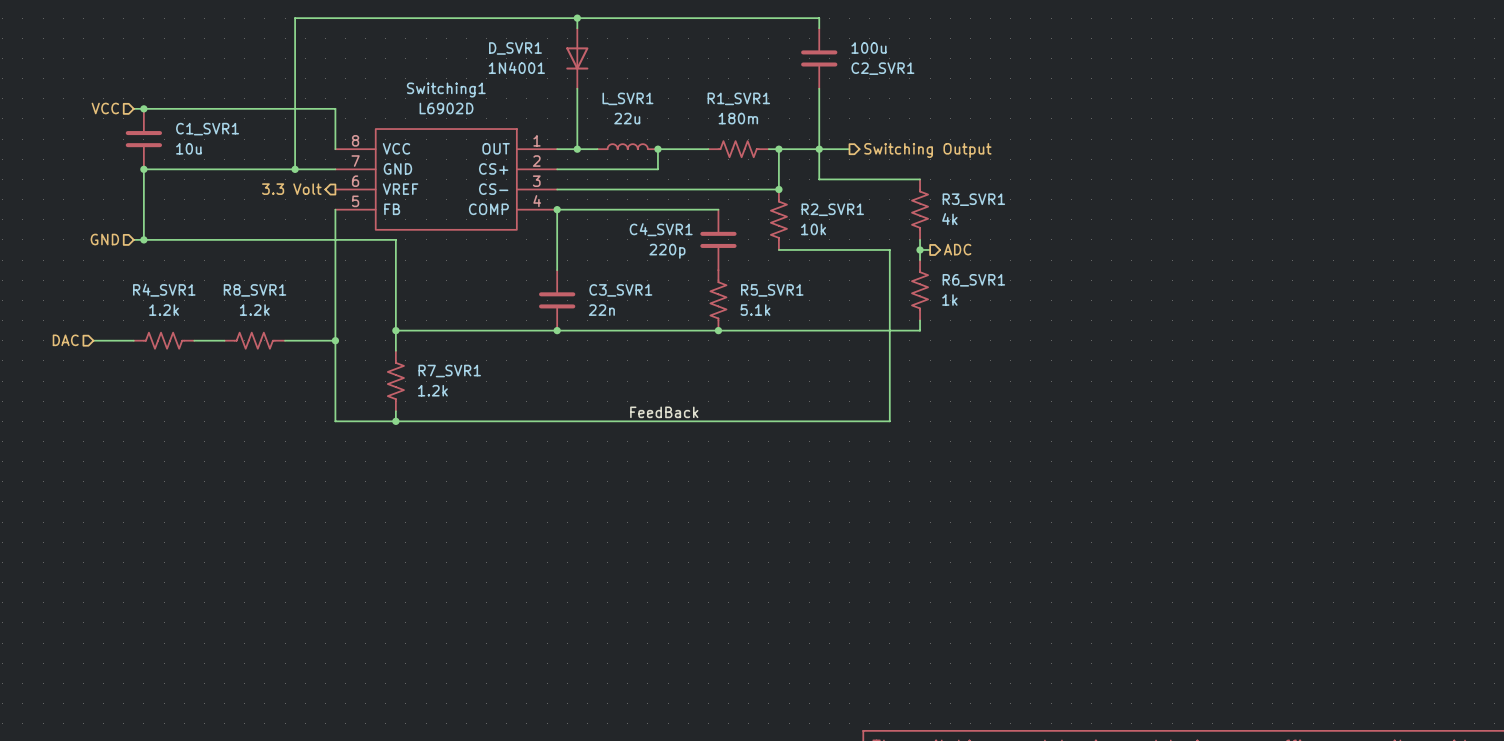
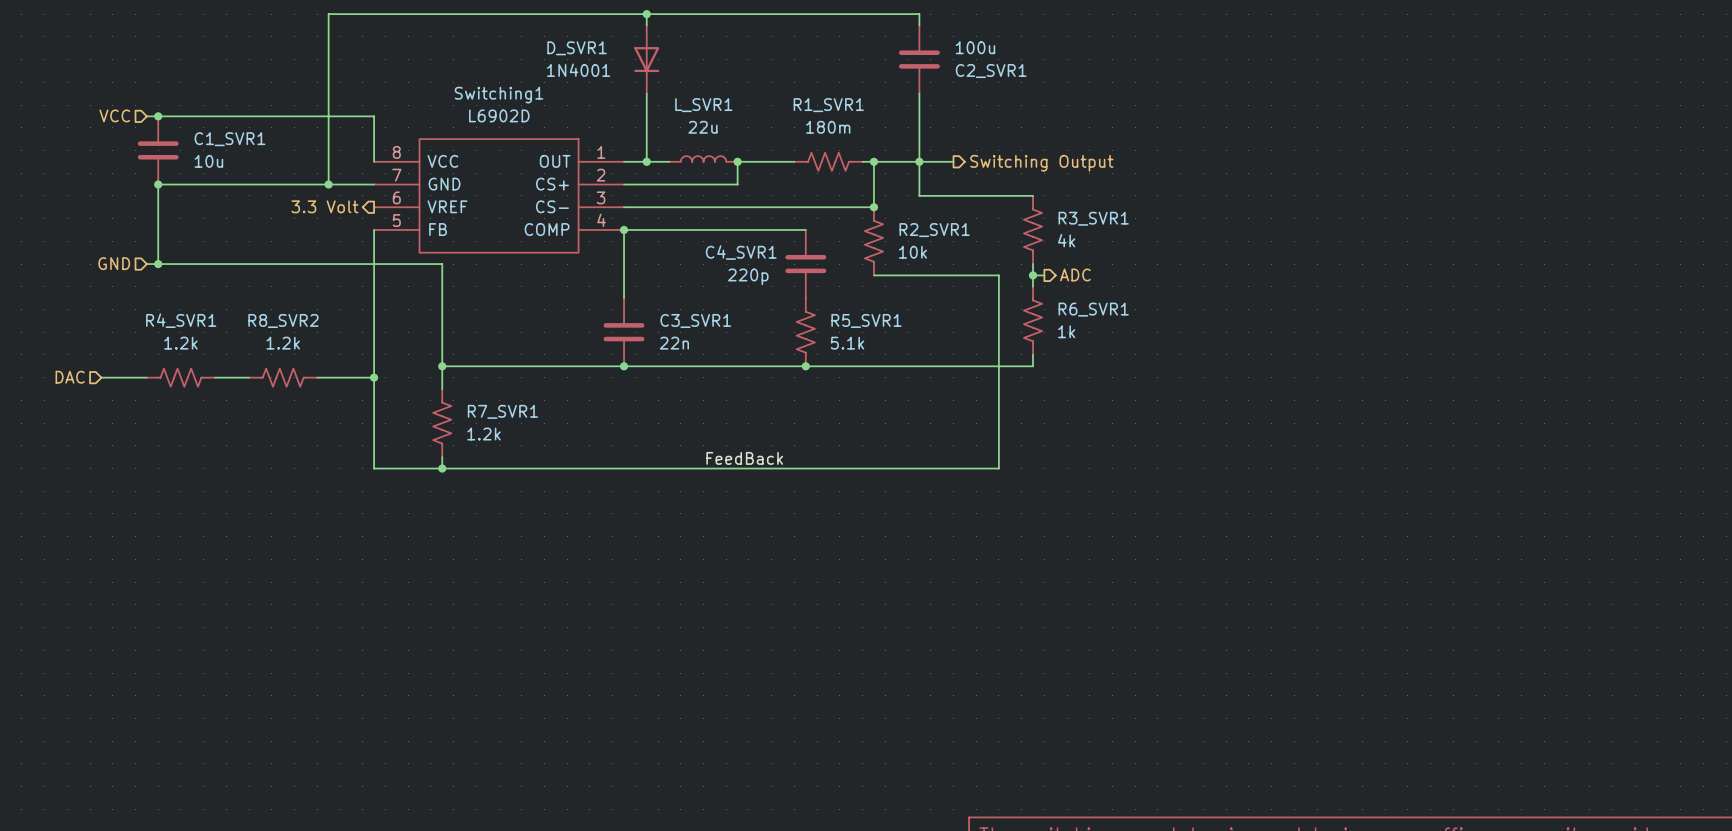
R8_SVR1 name: R8_SVR1 (255, 290) -> R8_SVR2 (283, 320)

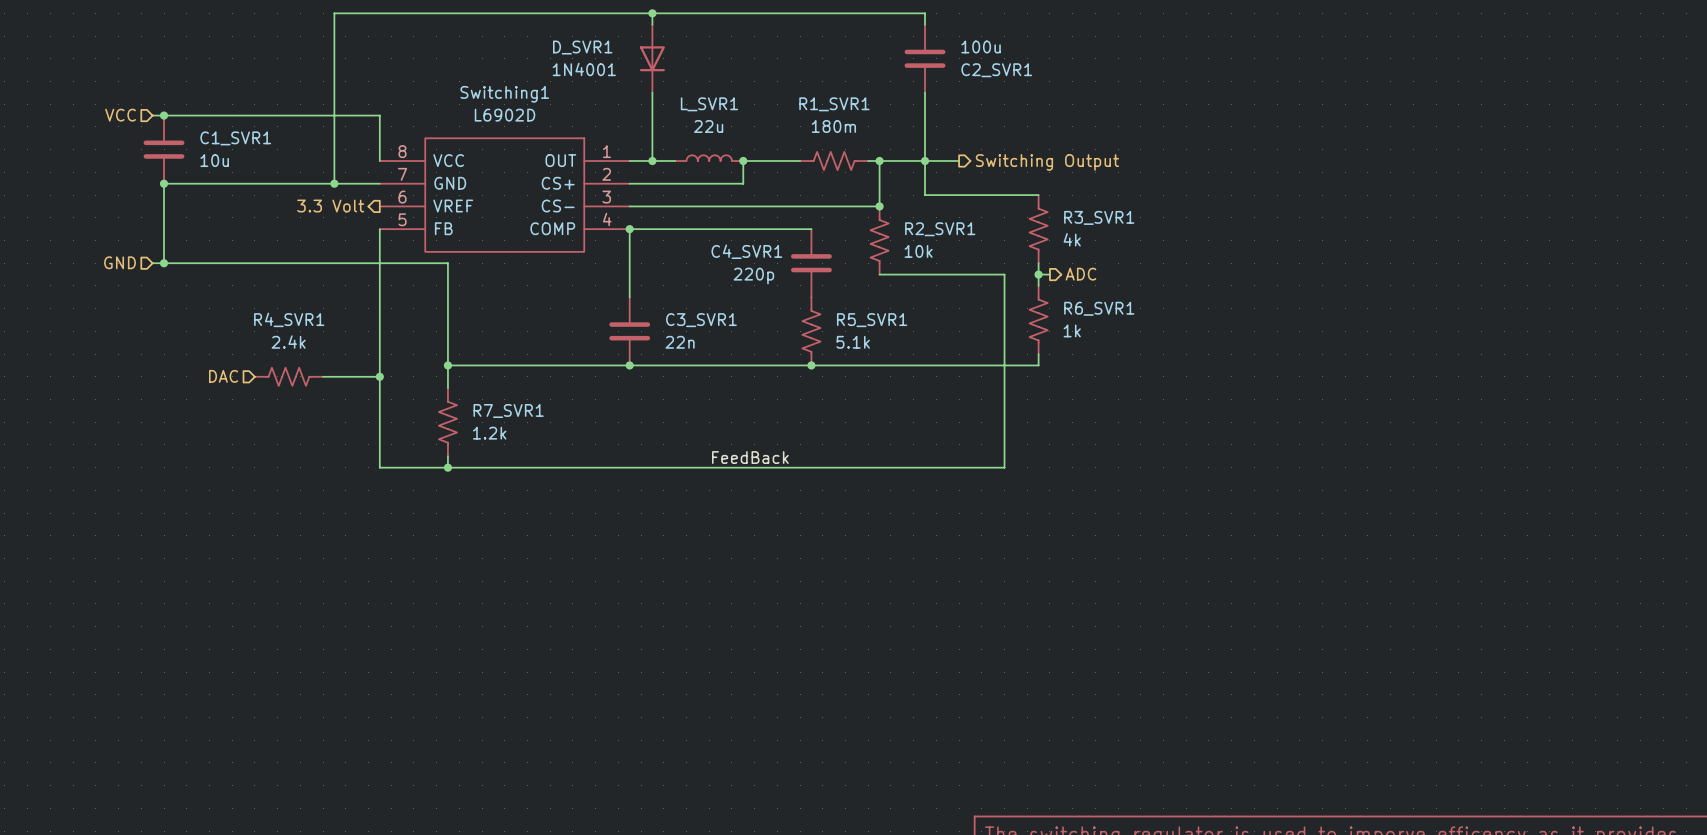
R8_SVR2 name: R8_SVR2 (283, 320) -> R4_SVR1 (289, 319)
R8_SVR2 value: 1.2k (283, 343) -> 2.4k (288, 342)
hierarchical label position: DAC (70, 377) -> DAC (223, 376)
wire: (101, 377) (146, 377) -> none
R4_SVR1: 1.2k (180, 377) -> none
wire: (215, 377) (249, 377) -> none

